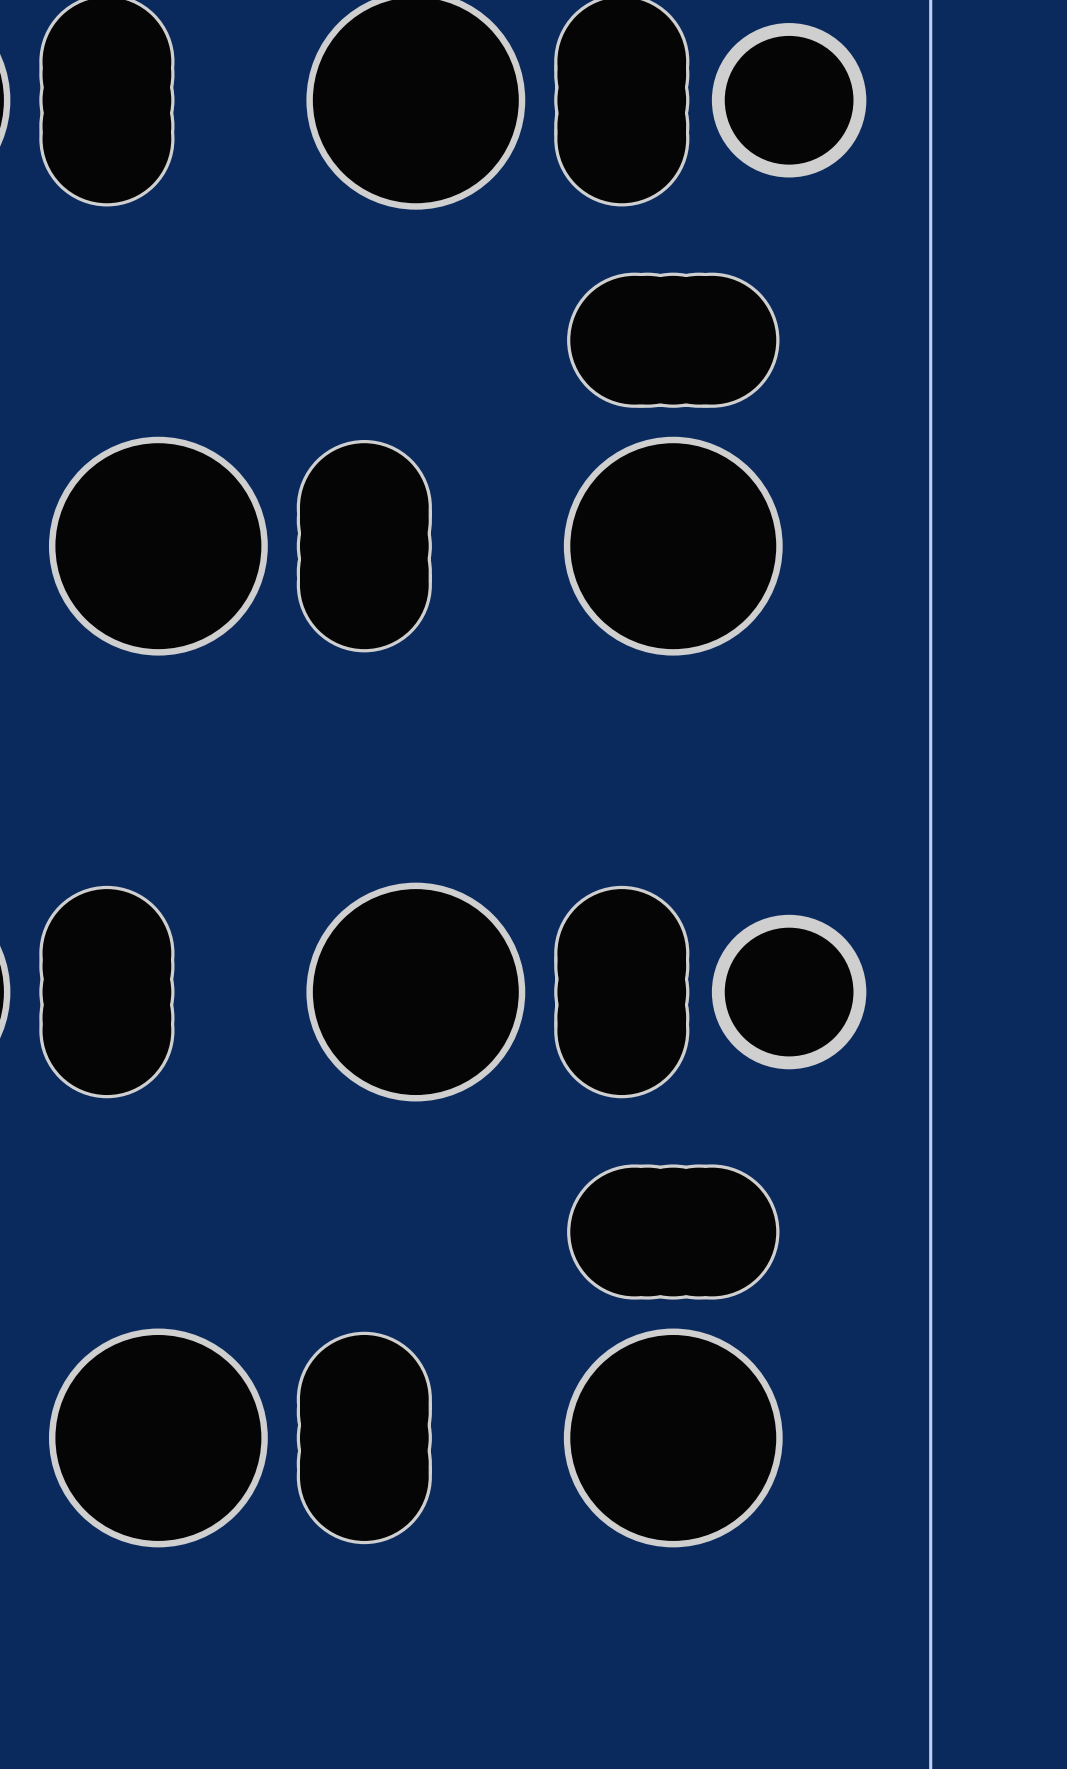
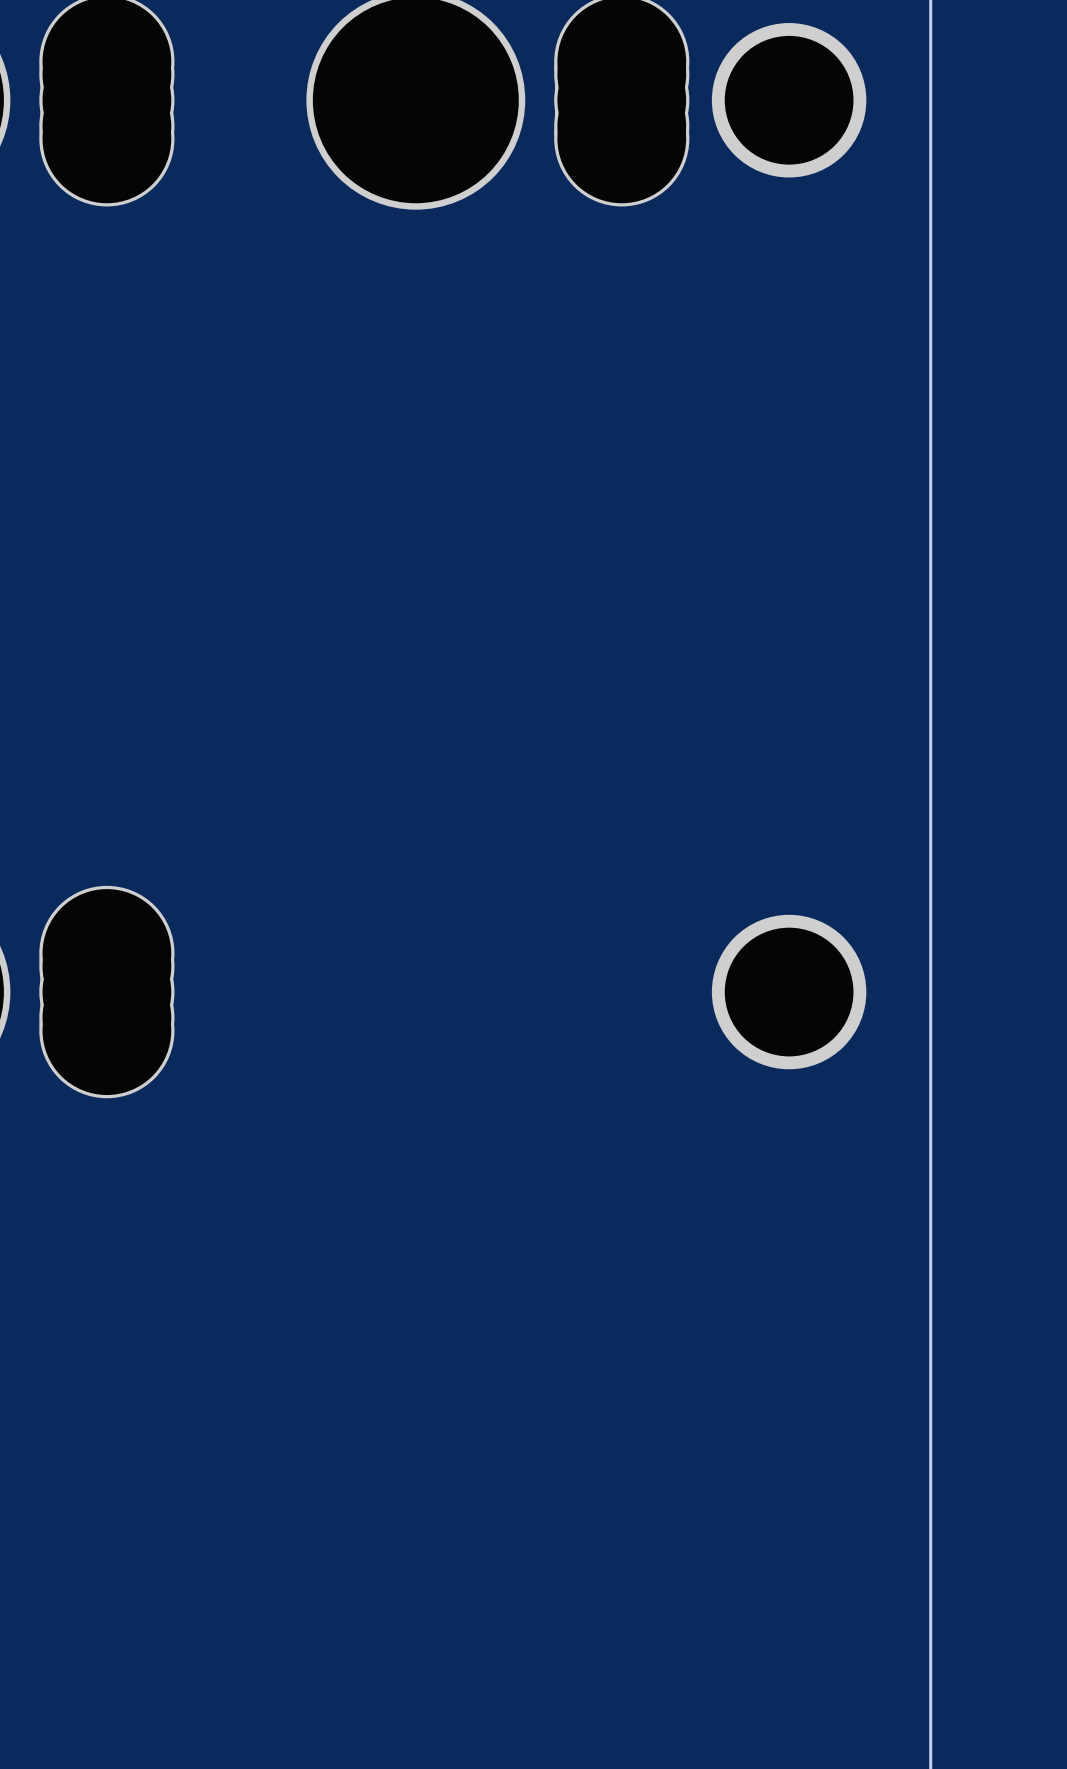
part: (673, 464) -> none
part: (240, 546) -> none
part: (497, 992) -> none
part: (673, 1355) -> none
part: (240, 1437) -> none

